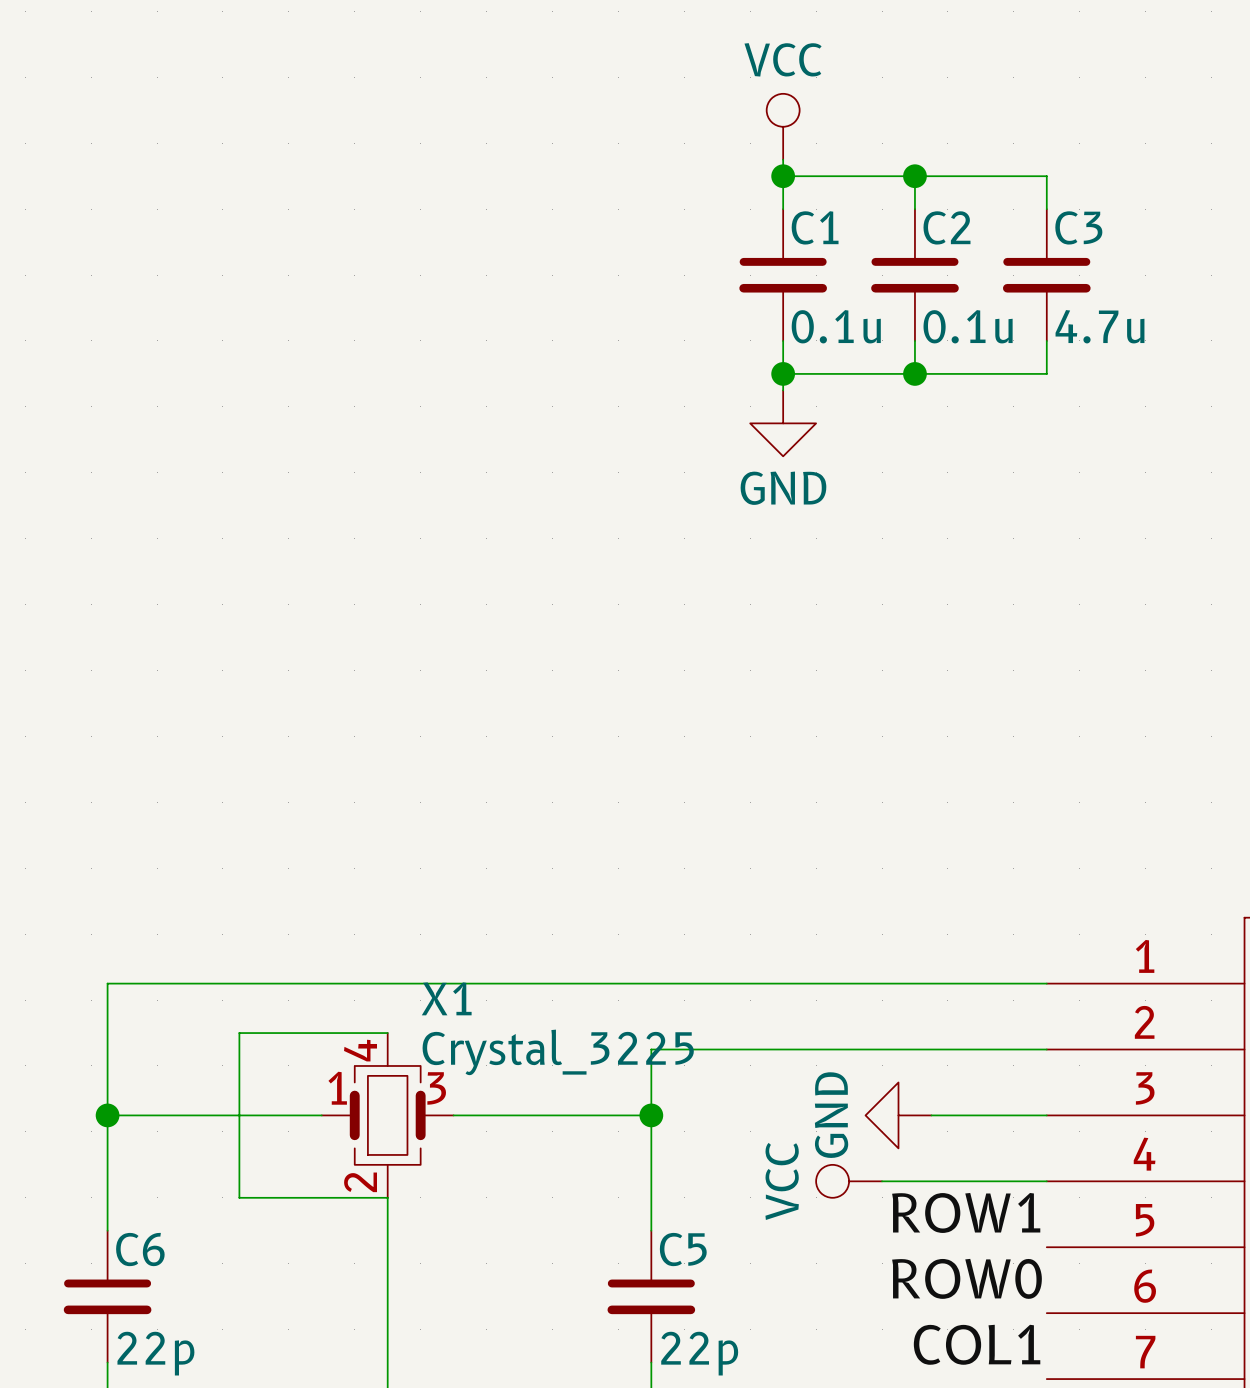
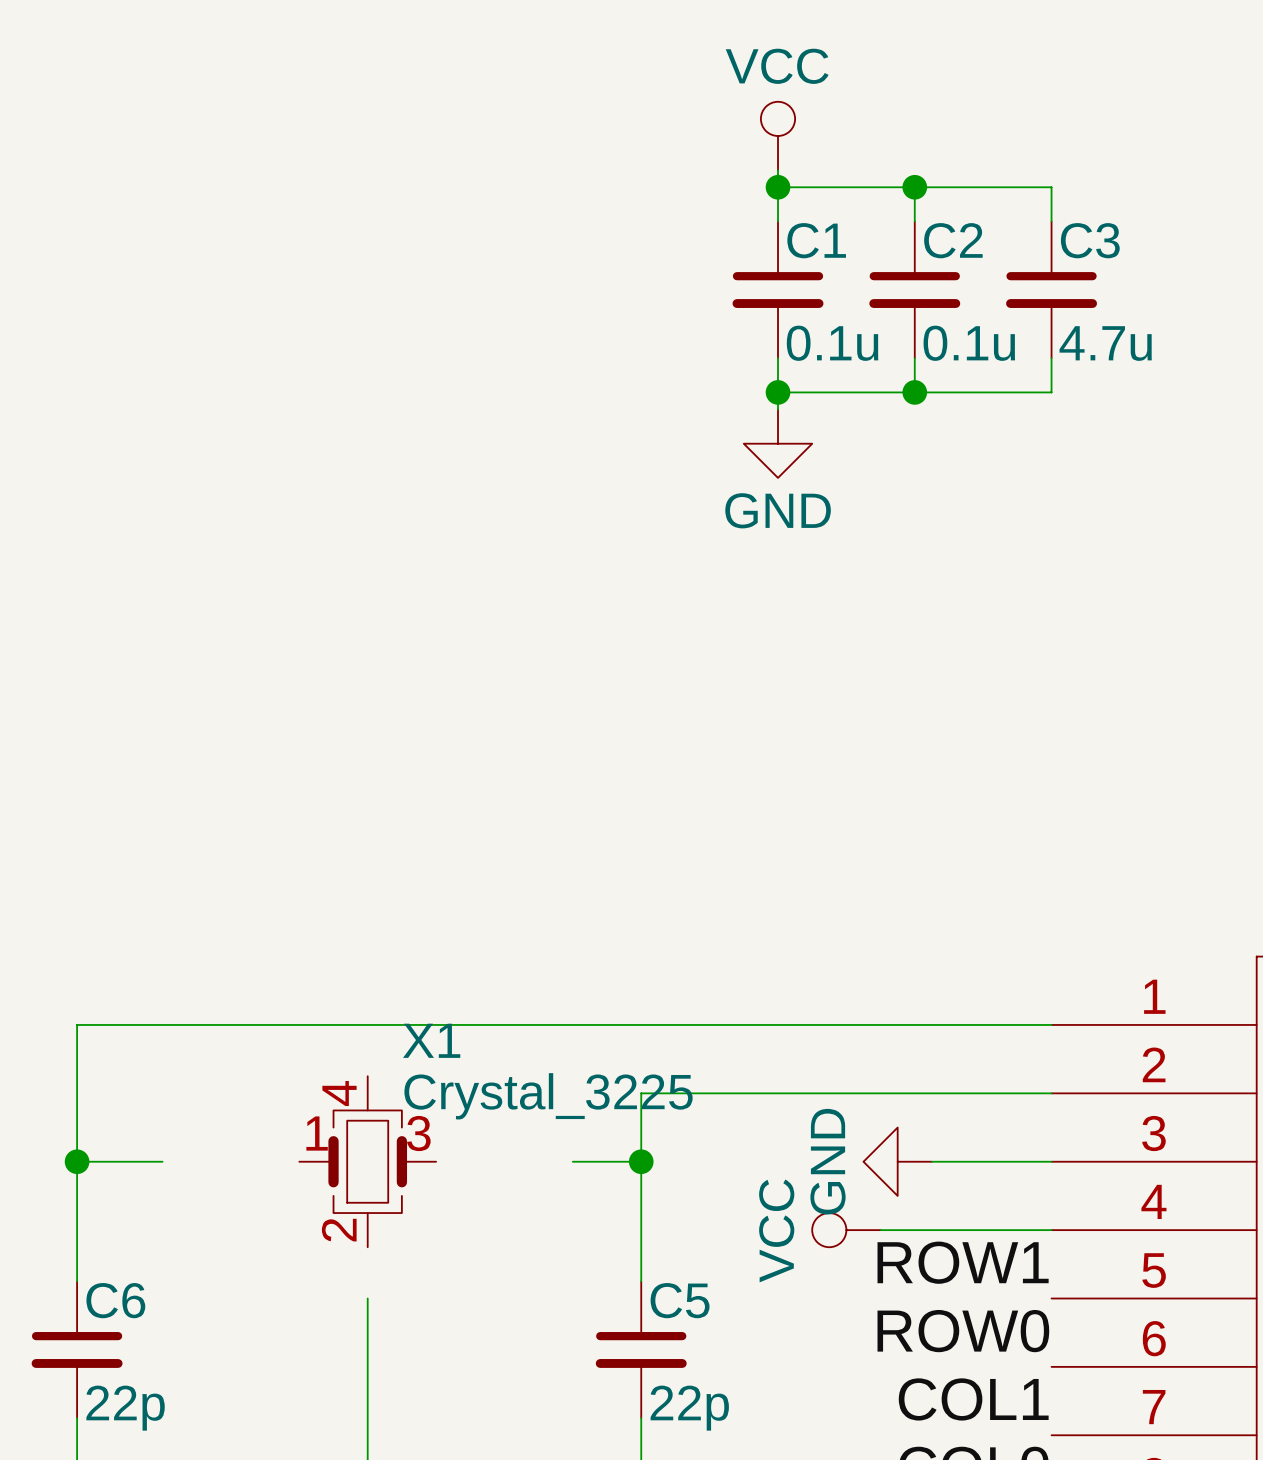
wire: (387, 1033) (239, 1033) (239, 1197) (387, 1197) (387, 1247) -> none
wire: (189, 1115) (321, 1115) -> none
wire: (453, 1115) (585, 1115) -> none

